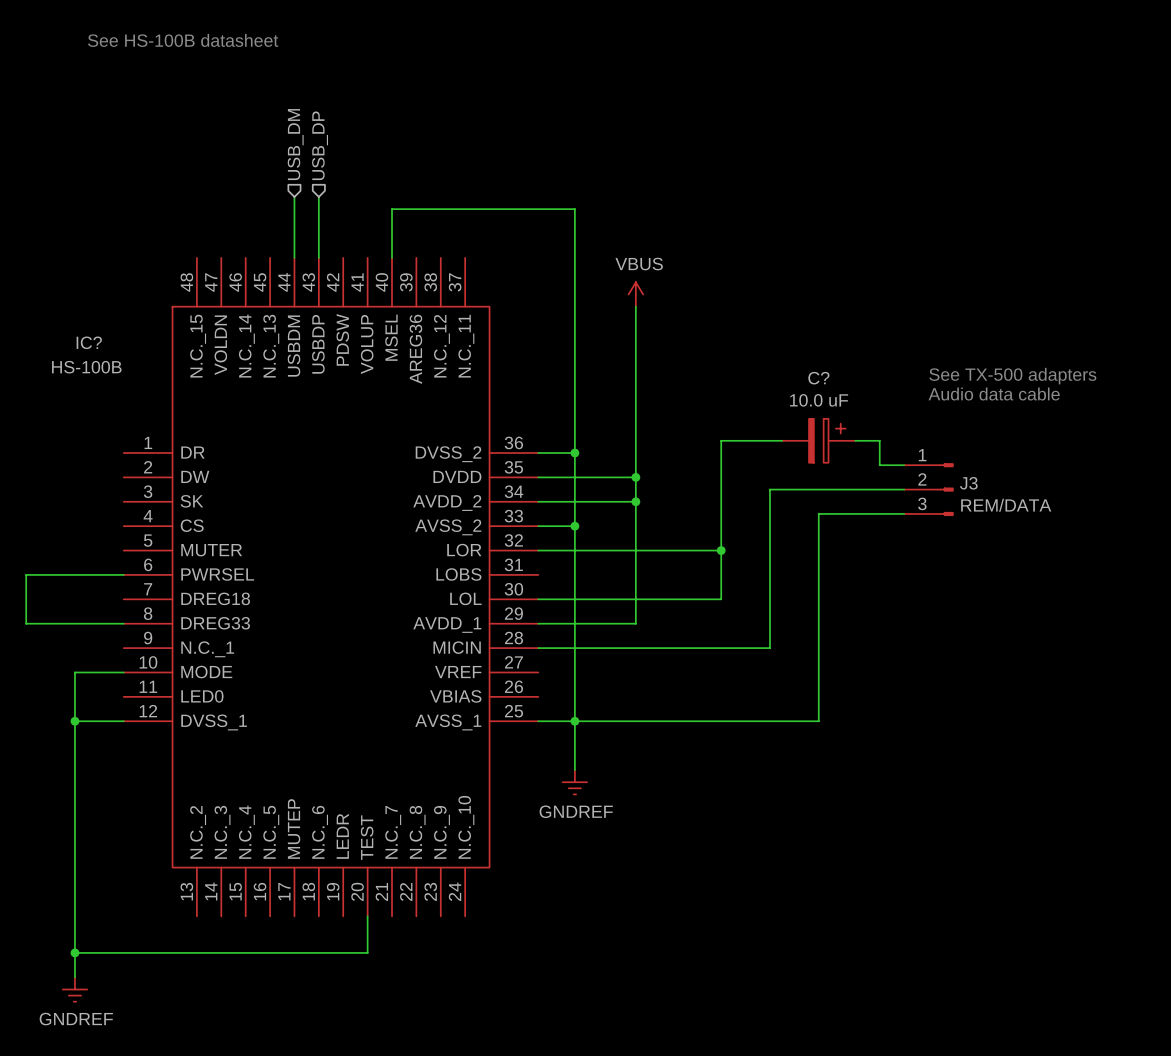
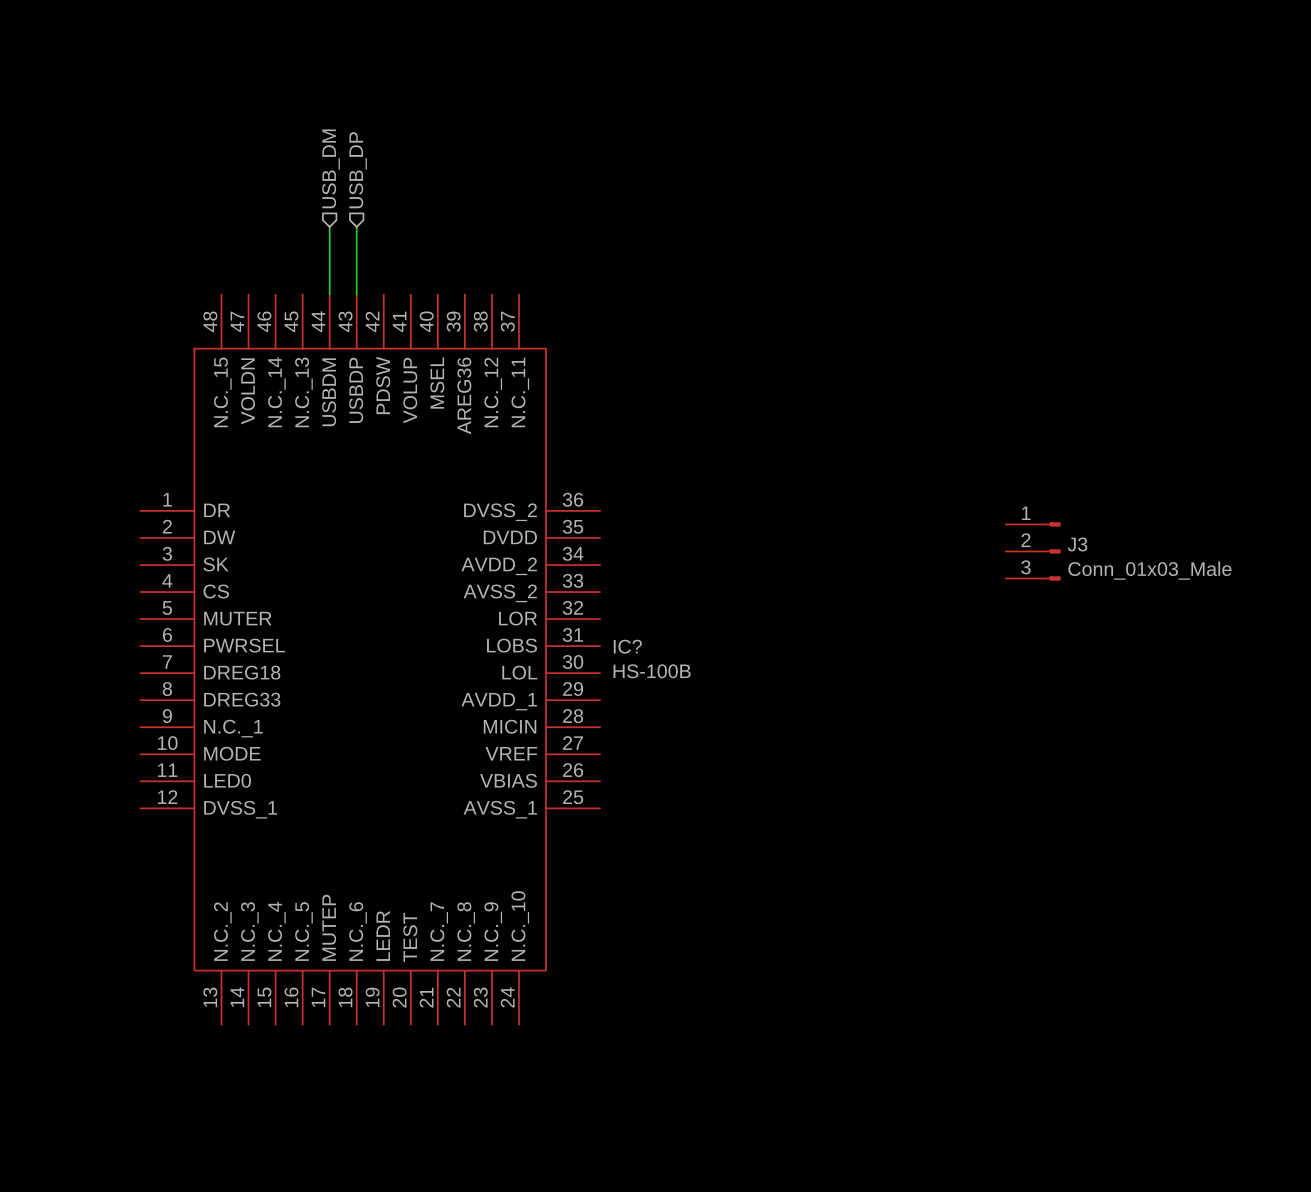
text: See HS-100B datasheet (183, 40) -> none
wire: (392, 257) (392, 209) (574, 209) (574, 770) -> none
power symbol: VBUS (635, 294) -> none
wire: (635, 306) (635, 623) (538, 623) -> none
IC? name position: IC? (89, 342) -> IC? (627, 646)
IC? value position: HS-100B (86, 367) -> HS-100B (652, 671)
text: See TX-500 adapters (1012, 376) -> none
text: Audio data cable (994, 394) -> none
wire: (782, 440) (721, 440) (721, 599) (538, 599) -> none
C?: 10.0 uF (818, 440) -> none
wire: (855, 440) (879, 440) (879, 465) (904, 465) -> none
wire: (538, 453) (574, 453) -> none
junction: (574, 453) -> none
wire: (538, 477) (635, 477) -> none
junction: (635, 477) -> none
wire: (904, 489) (769, 489) (769, 648) (538, 648) -> none
wire: (538, 501) (635, 501) -> none
junction: (635, 501) -> none
J3 value: REM/DATA (1006, 505) -> Conn_01x03_Male (1149, 570)
wire: (904, 513) (818, 513) (818, 721) (538, 721) -> none
wire: (538, 526) (574, 526) -> none
junction: (574, 526) -> none
wire: (538, 550) (721, 550) -> none
junction: (721, 550) -> none
wire: (123, 574) (26, 574) (26, 623) (123, 623) -> none
wire: (123, 672) (74, 672) (74, 977) -> none
wire: (74, 721) (123, 721) -> none
junction: (74, 721) -> none
junction: (574, 721) -> none
power symbol: GNDREF (574, 782) -> none
wire: (367, 916) (367, 952) (74, 952) -> none
junction: (74, 952) -> none
power symbol: GNDREF (74, 989) -> none

